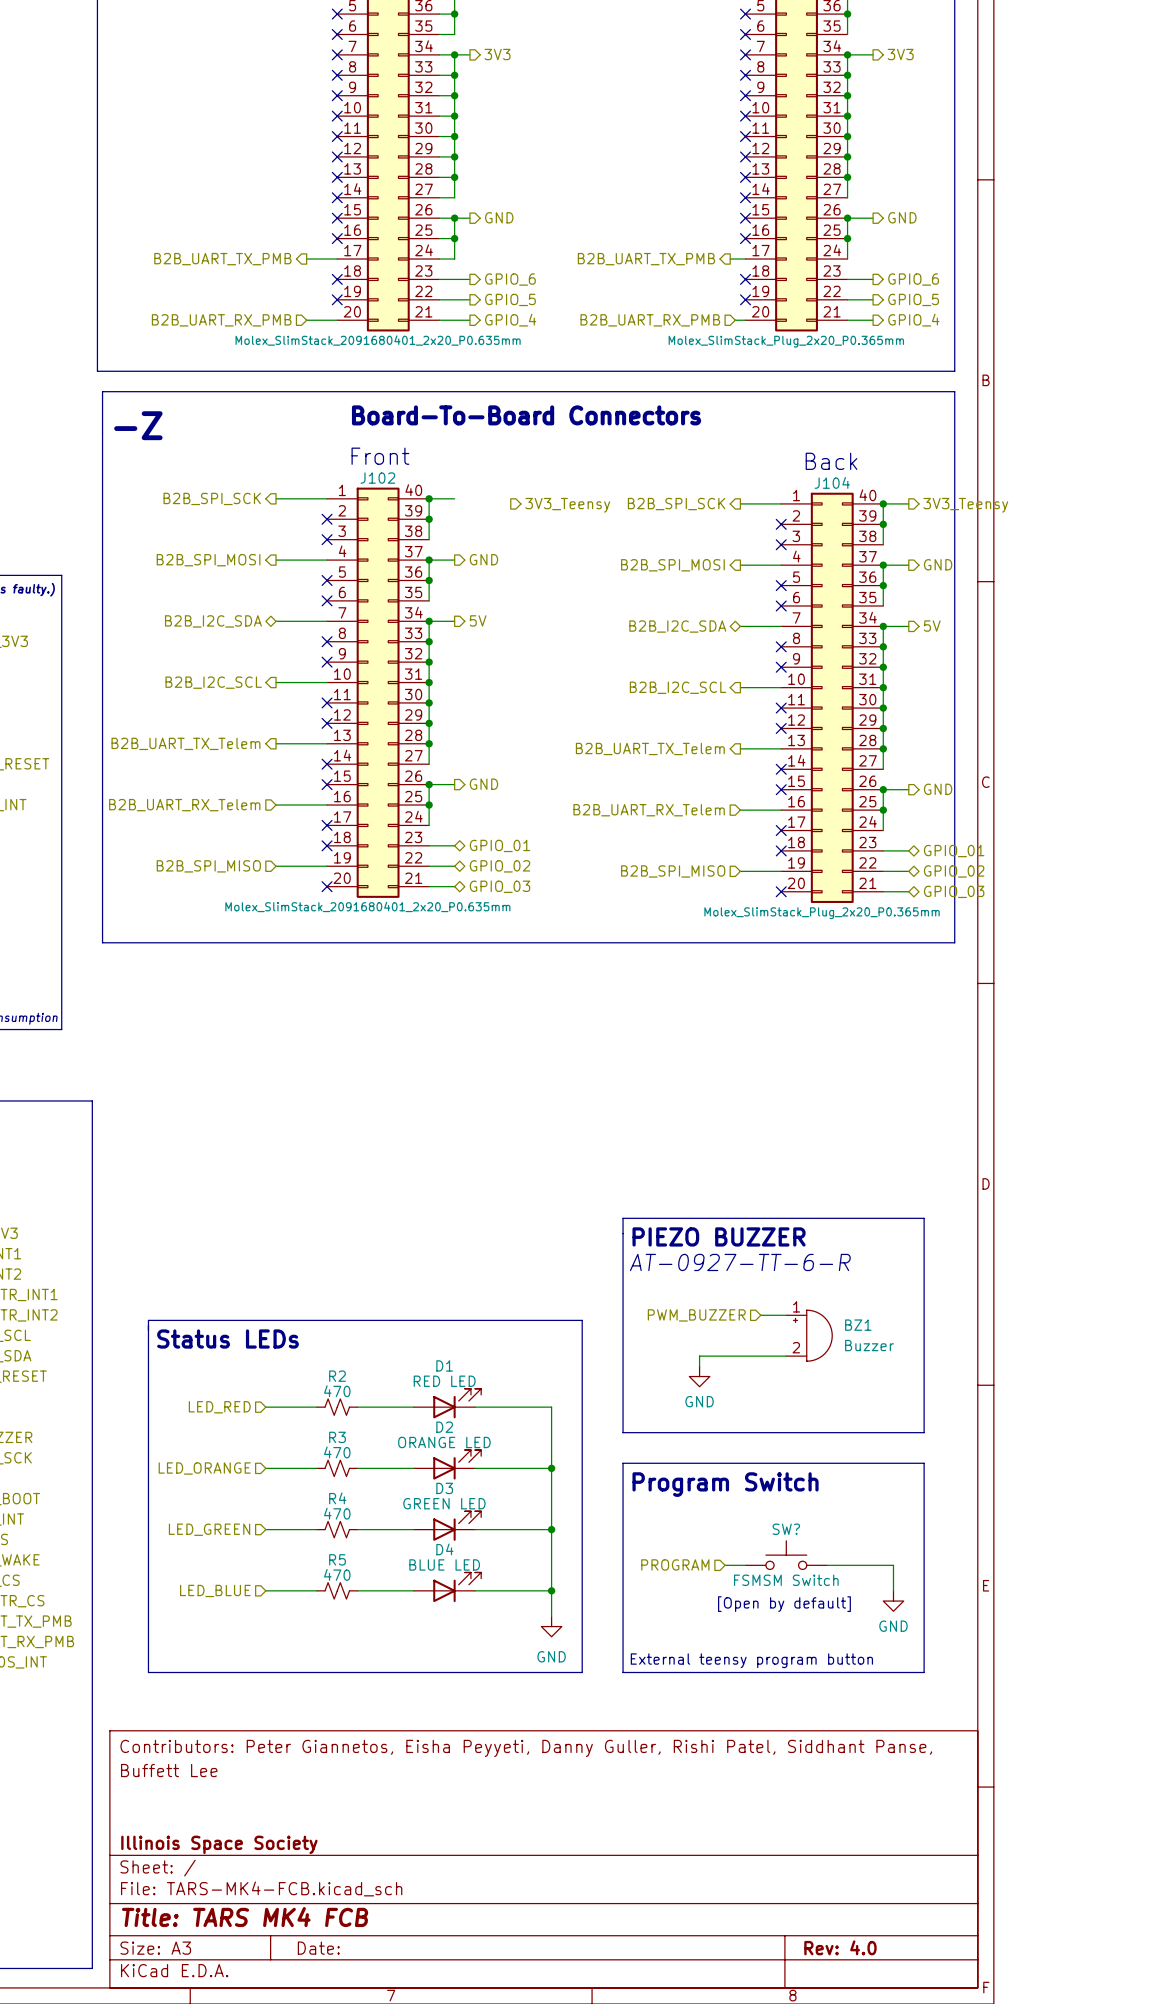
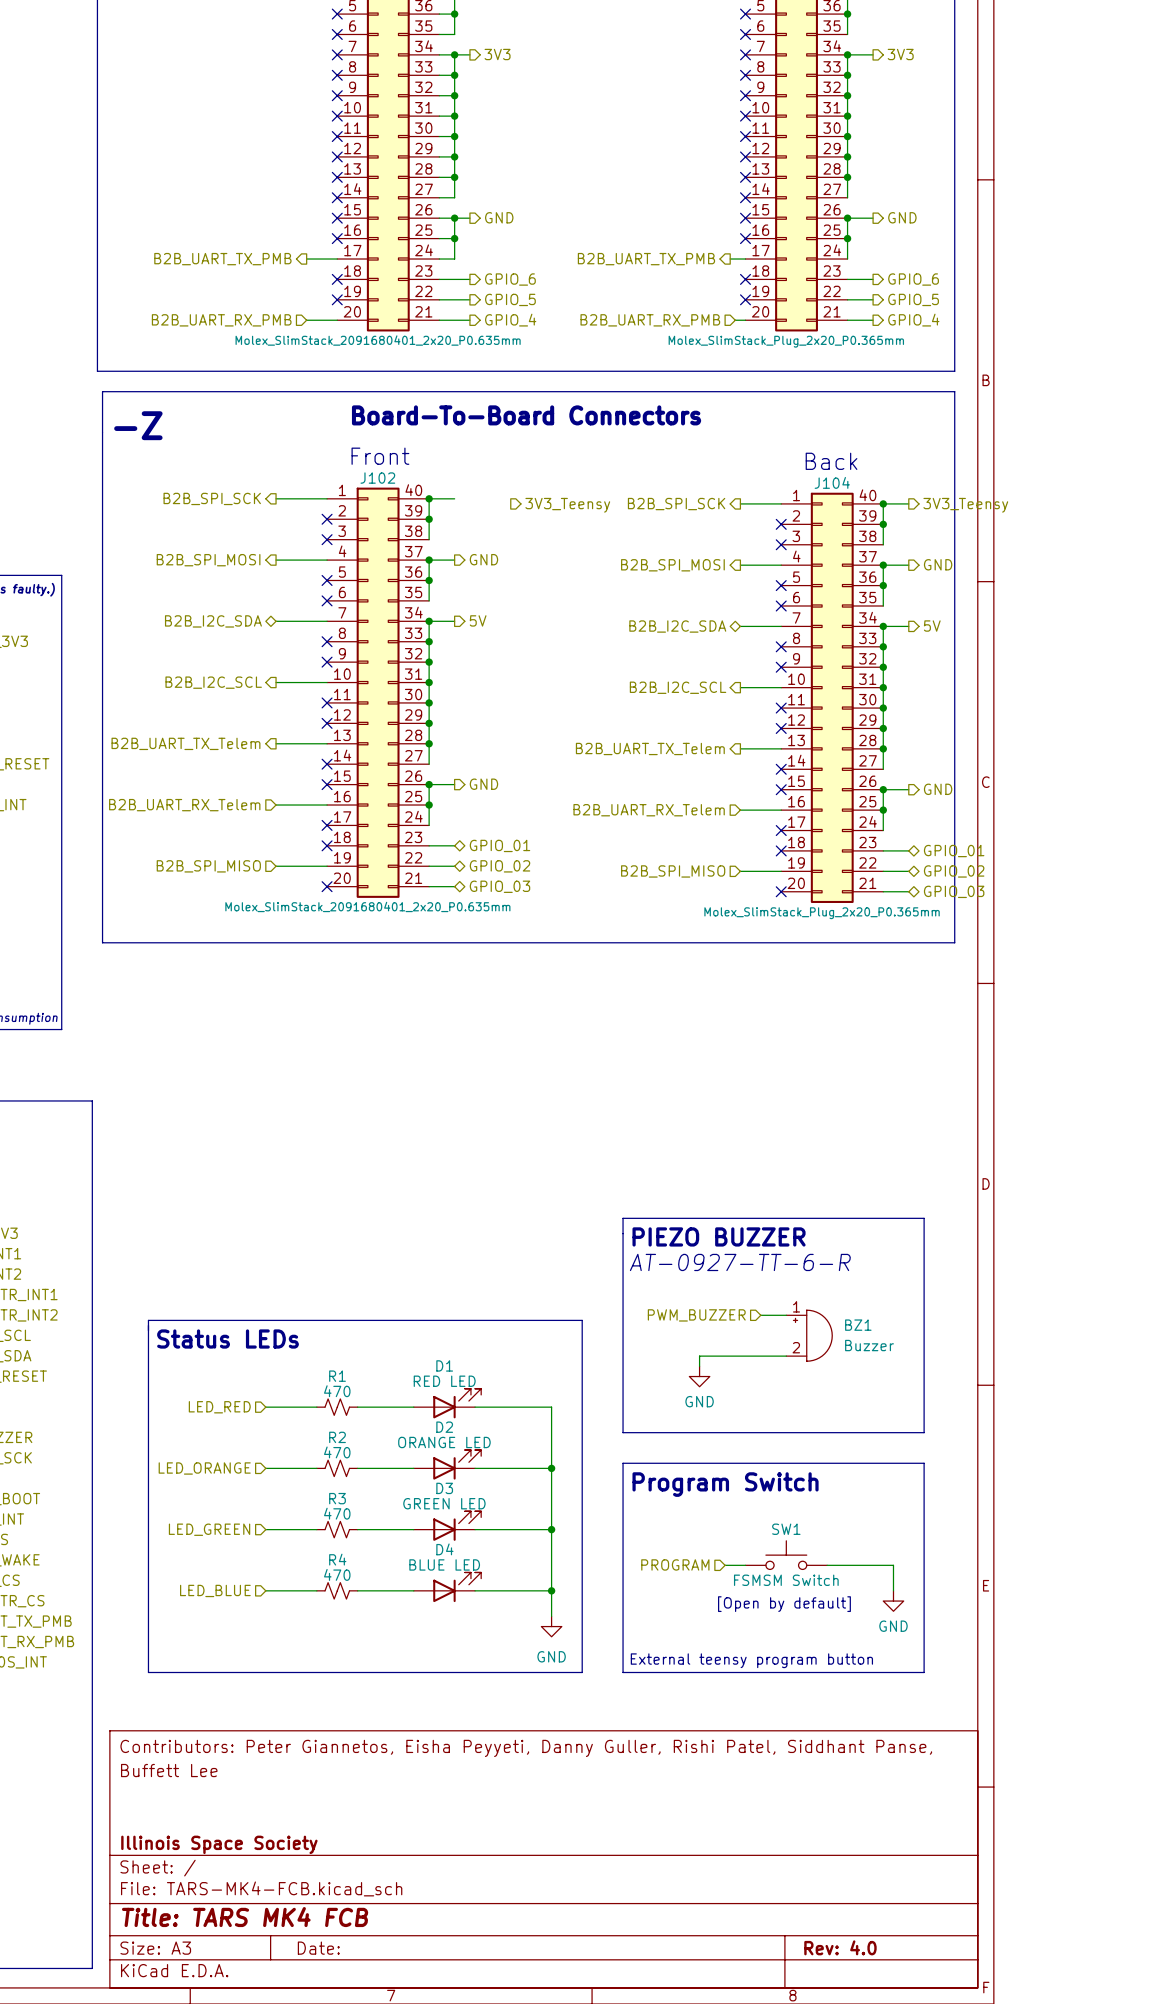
R2 name: R2 (337, 1376) -> R1 (337, 1376)
R3 name: R3 (337, 1437) -> R2 (337, 1437)
R4 name: R4 (337, 1498) -> R3 (337, 1498)
SW? name: SW? (786, 1529) -> SW1 (786, 1529)
R5 name: R5 (337, 1559) -> R4 (337, 1559)

